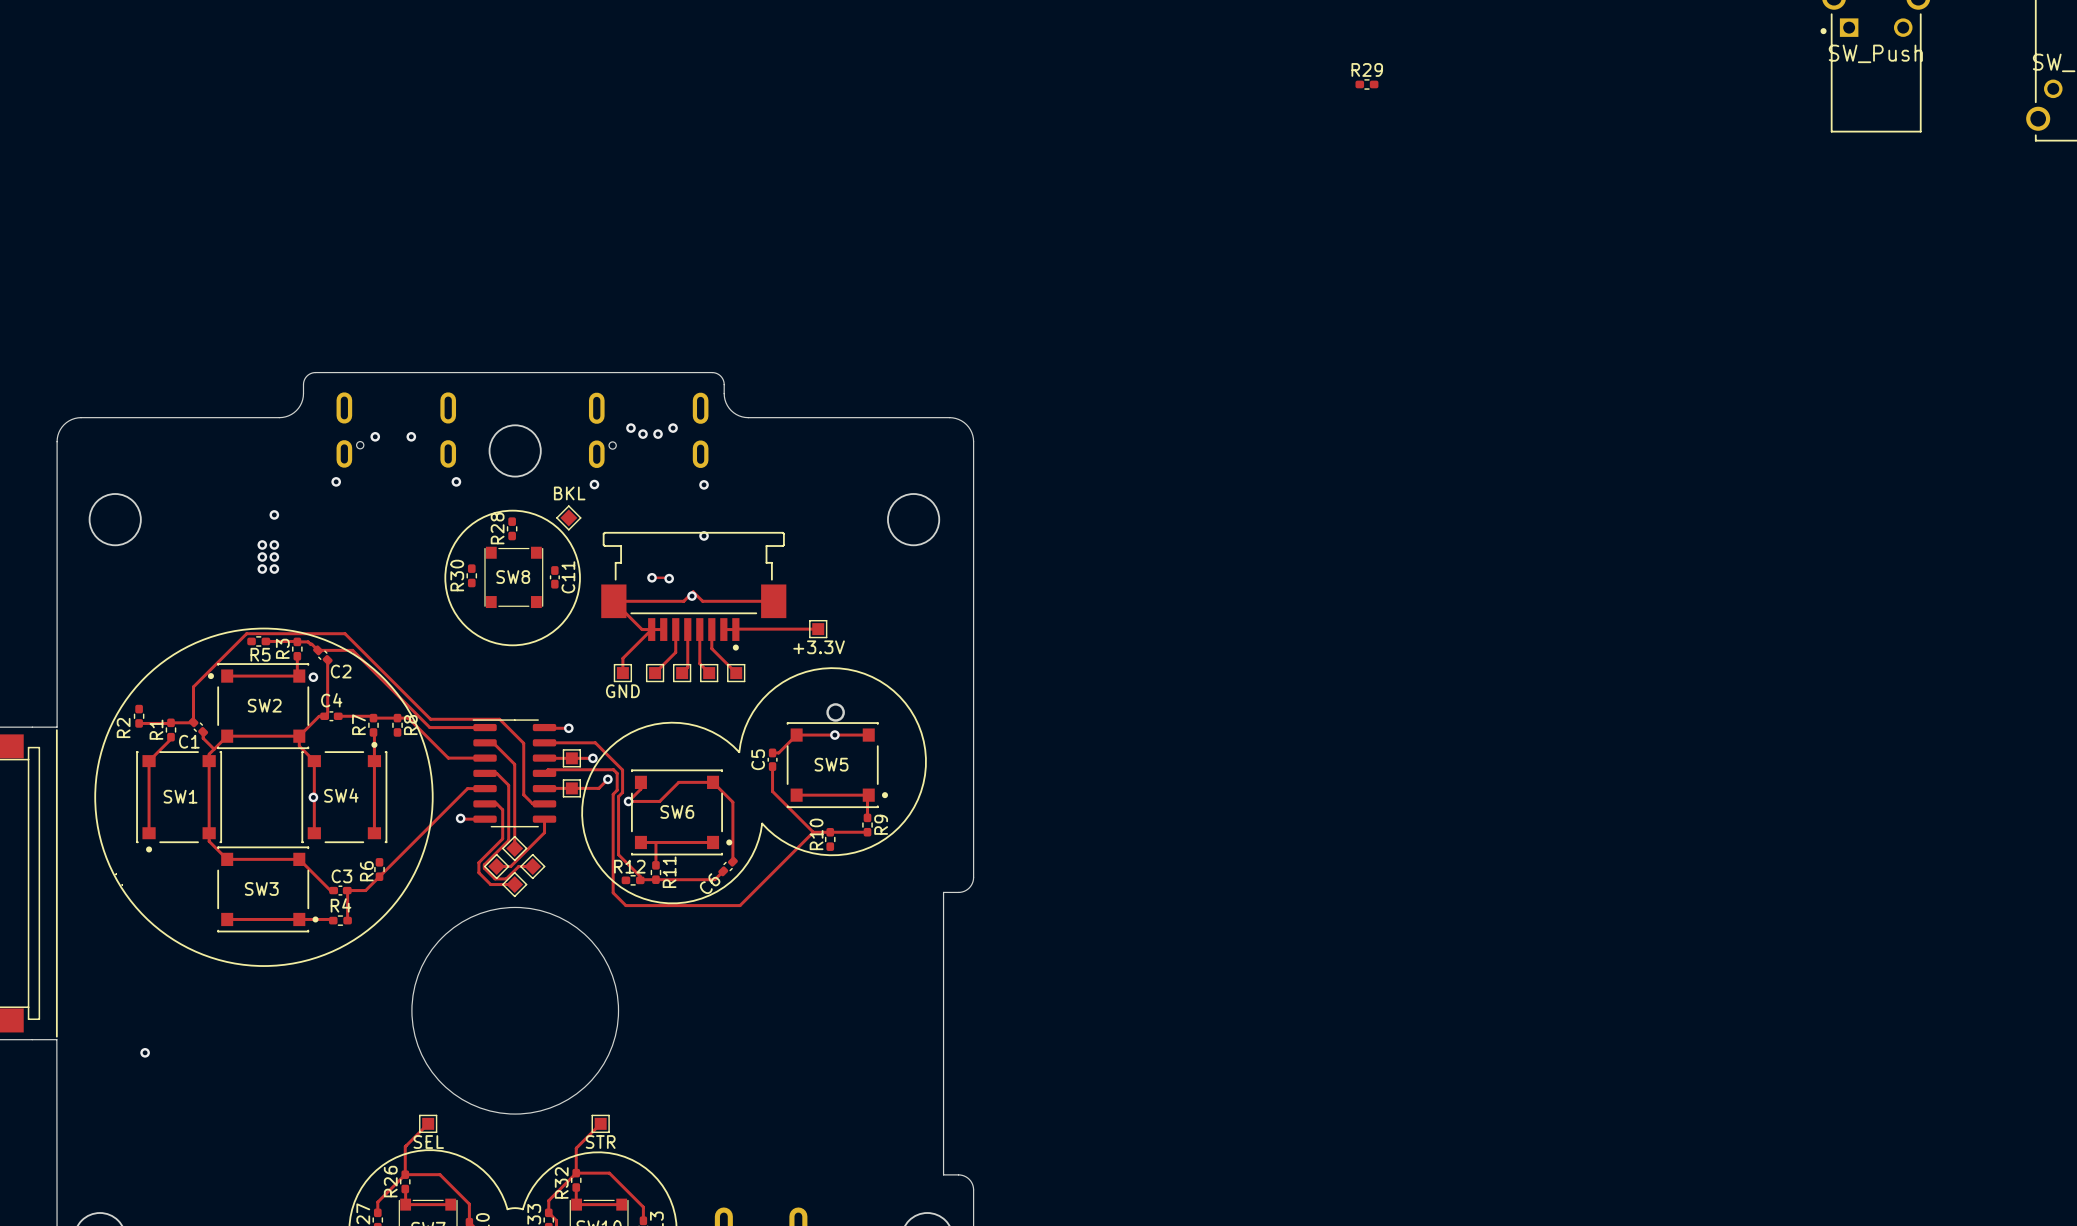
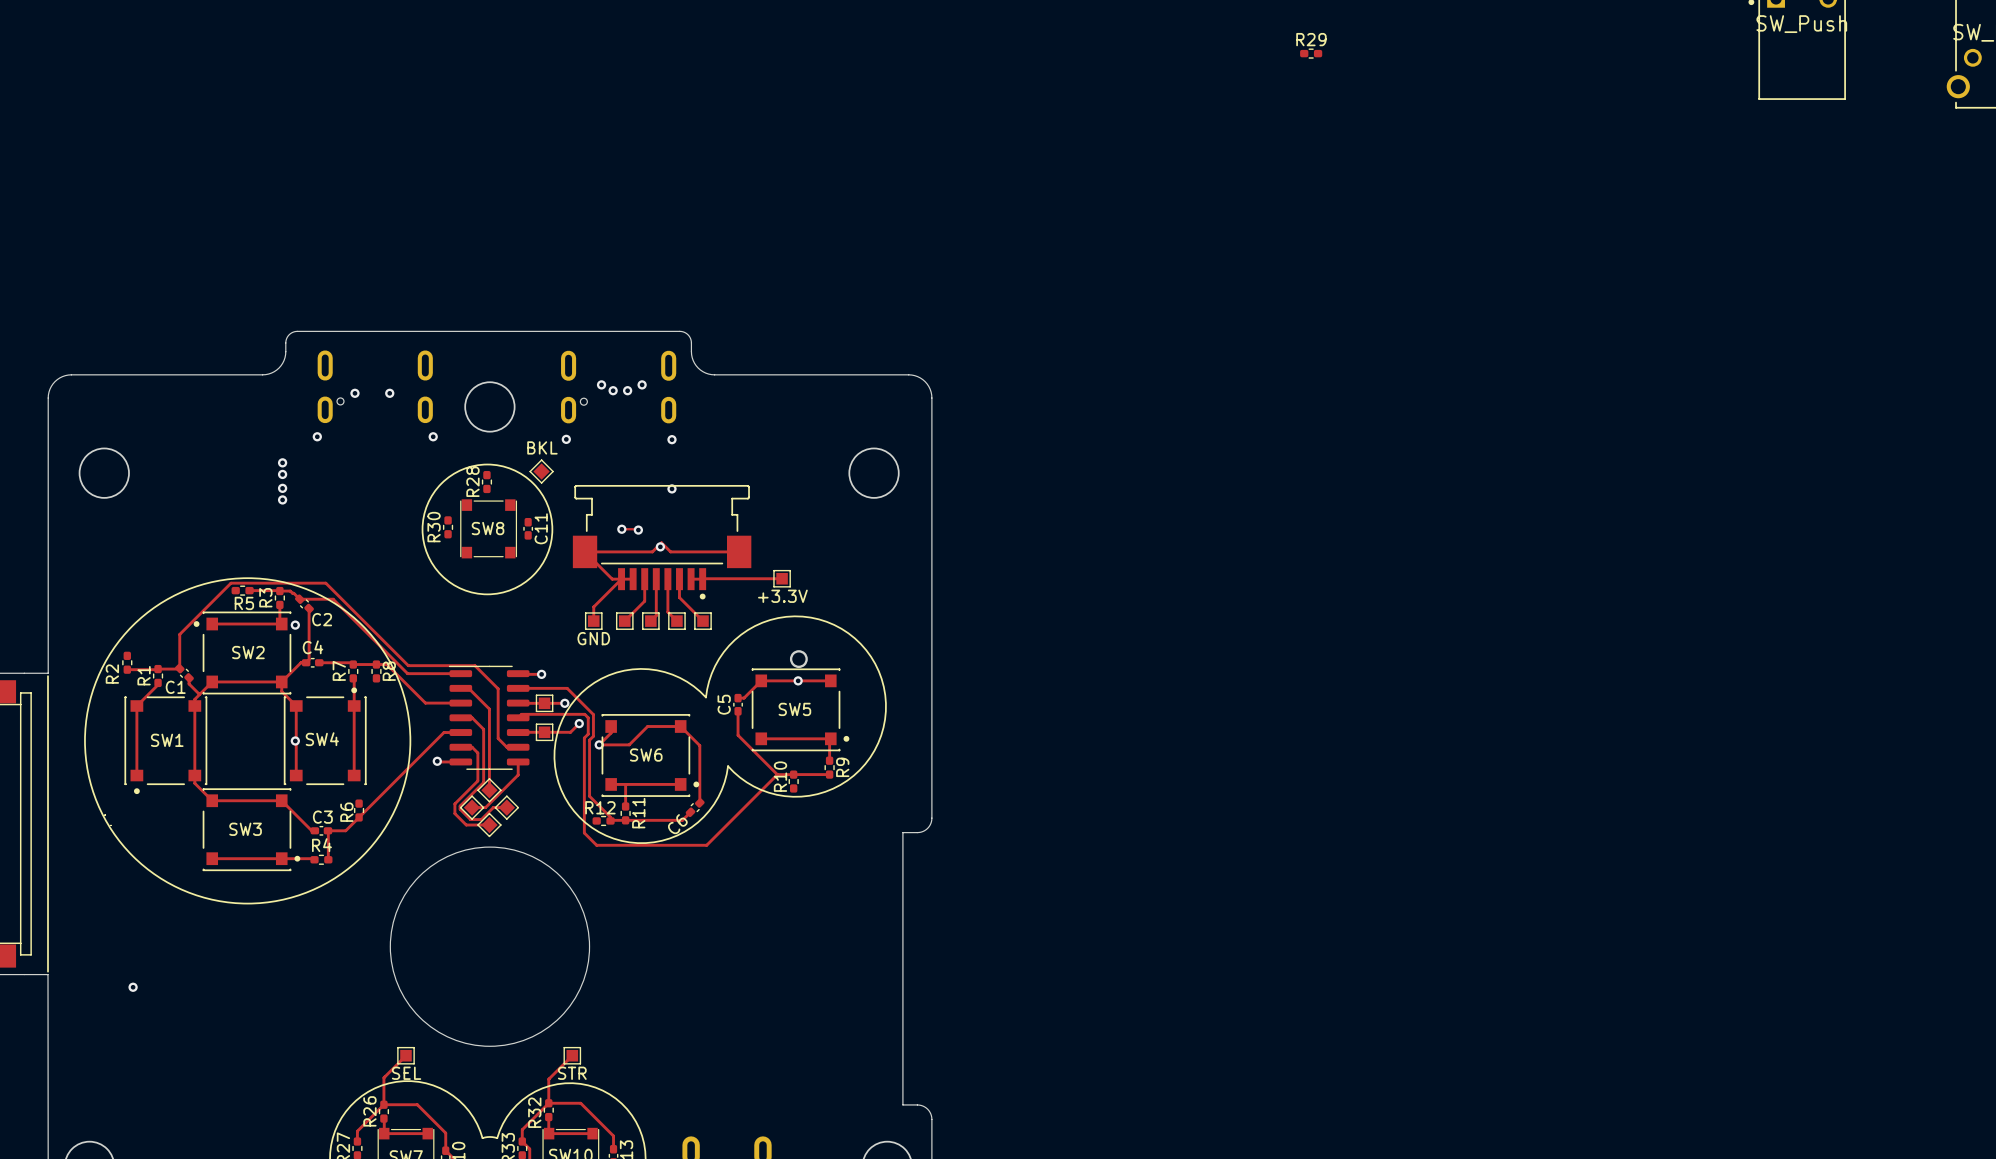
via: none -> (282, 462)
via: (274, 514) -> none
via: none -> (282, 474)
via: none -> (282, 488)
via: (262, 544) -> none
via: (274, 544) -> none
via: none -> (282, 499)
via: (262, 557) -> none
via: (274, 557) -> none
via: (262, 569) -> none
via: (274, 569) -> none

